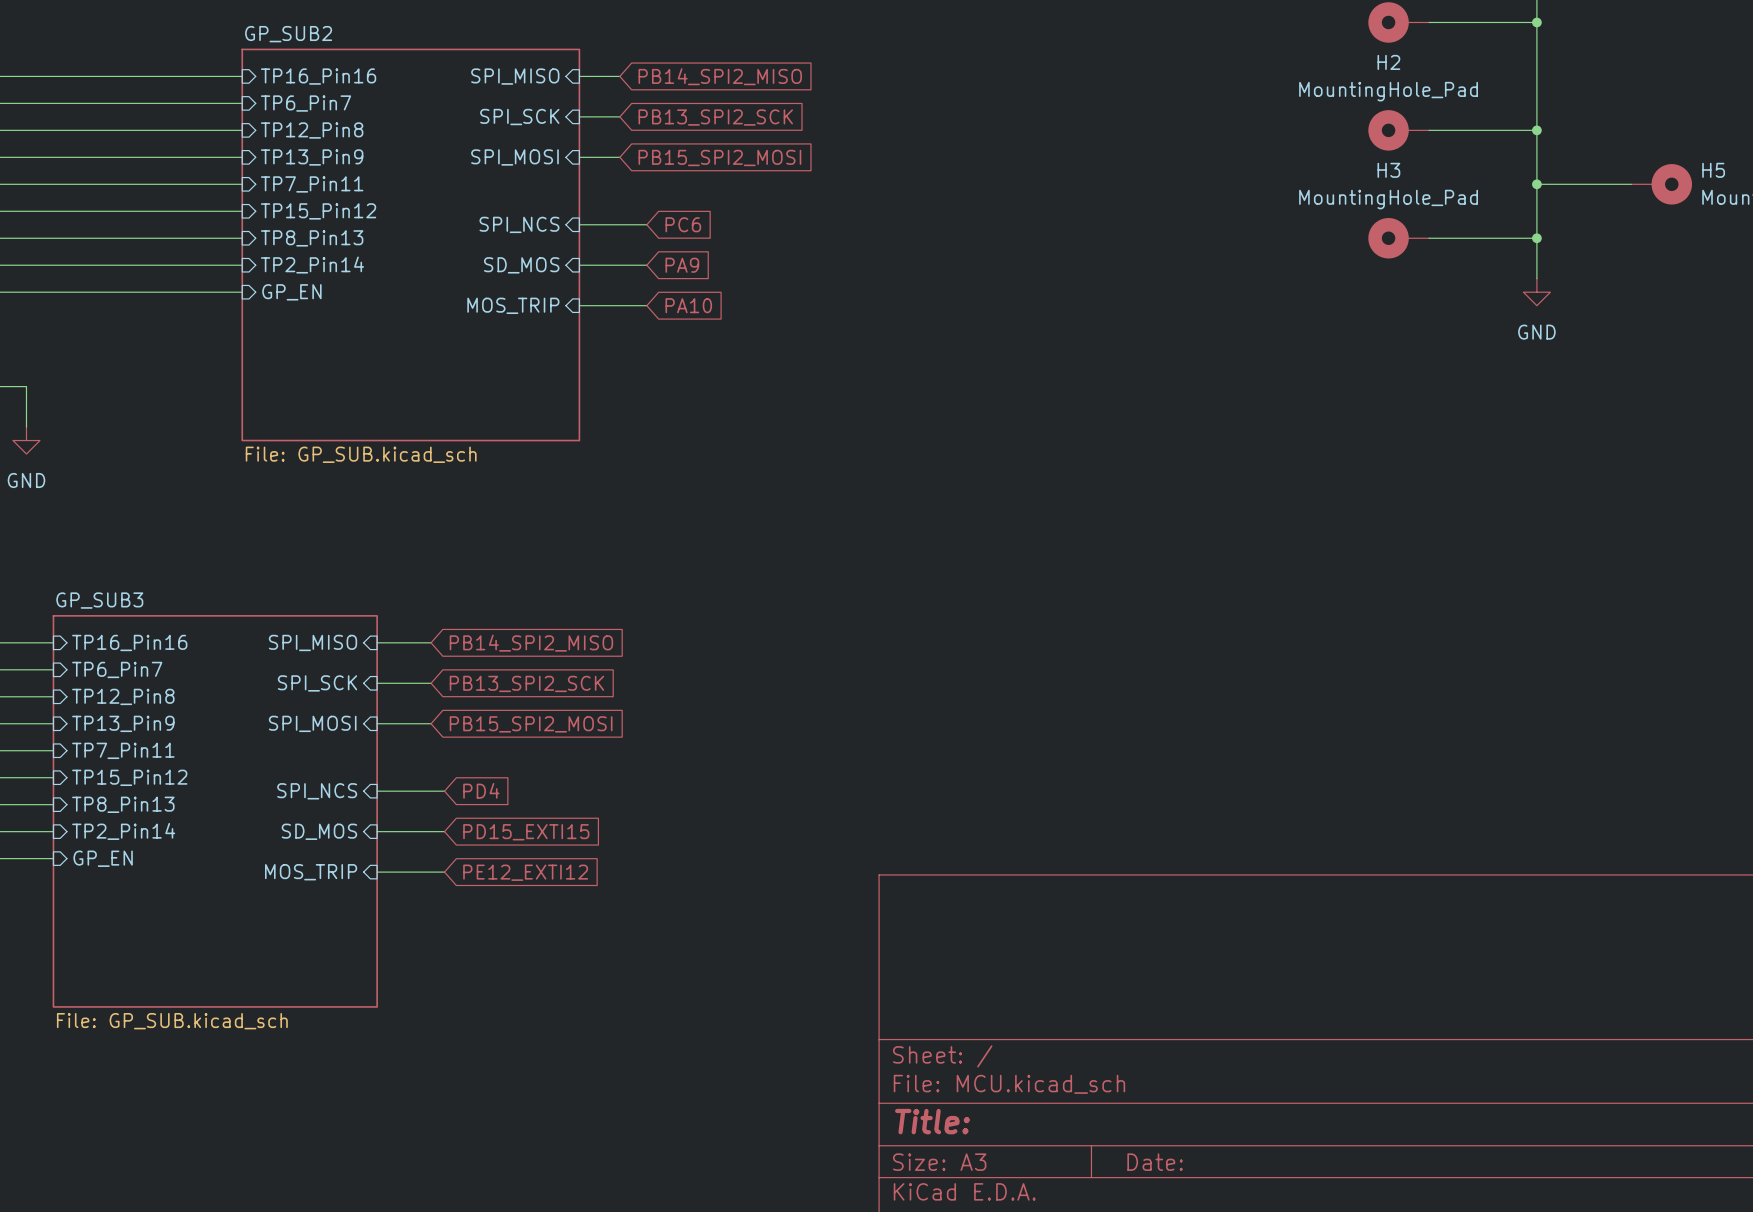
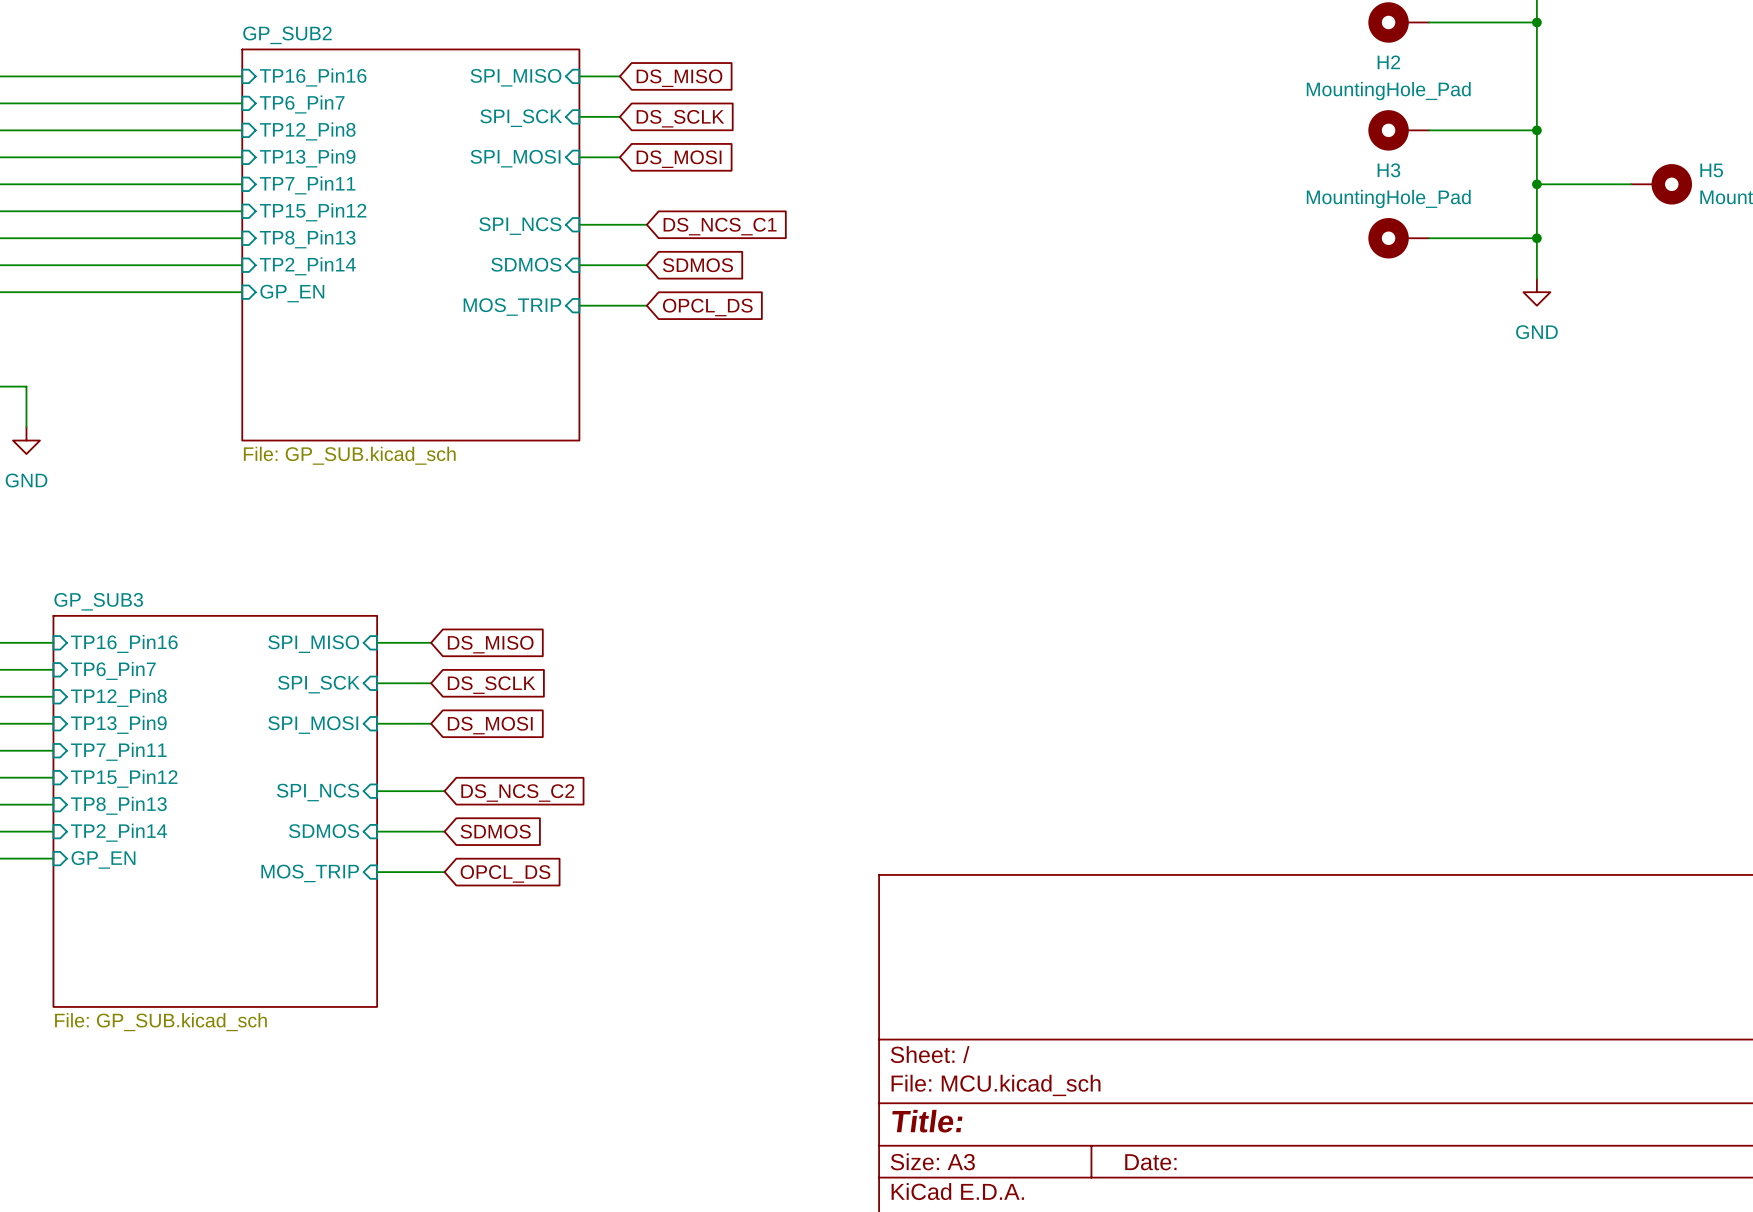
global label: PB14_SPI2_MISO (720, 76) -> DS_MISO (679, 78)
global label: PB13_SPI2_SCK (715, 117) -> DS_SCLK (680, 118)
global label: PB15_SPI2_MOSI (719, 157) -> DS_MOSI (679, 159)
global label: PC6 (683, 224) -> DS_NCS_C1 (720, 226)
sheet pin: SD_MOS (521, 265) -> SDMOS (526, 264)
global label: PA9 (682, 265) -> SDMOS (697, 265)
global label: PA10 (688, 305) -> OPCL_DS (707, 307)
global label: PB14_SPI2_MISO (531, 643) -> DS_MISO (490, 644)
global label: PB13_SPI2_SCK (526, 683) -> DS_SCLK (491, 685)
global label: PB15_SPI2_MOSI (531, 724) -> DS_MOSI (490, 725)
global label: PD4 (481, 790) -> DS_NCS_C2 (517, 793)
sheet pin: SD_MOS (319, 831) -> SDMOS (324, 831)
global label: PD15_EXTI15 (526, 832) -> SDMOS (495, 831)
global label: PE12_EXTI12 (525, 872) -> OPCL_DS (505, 873)

